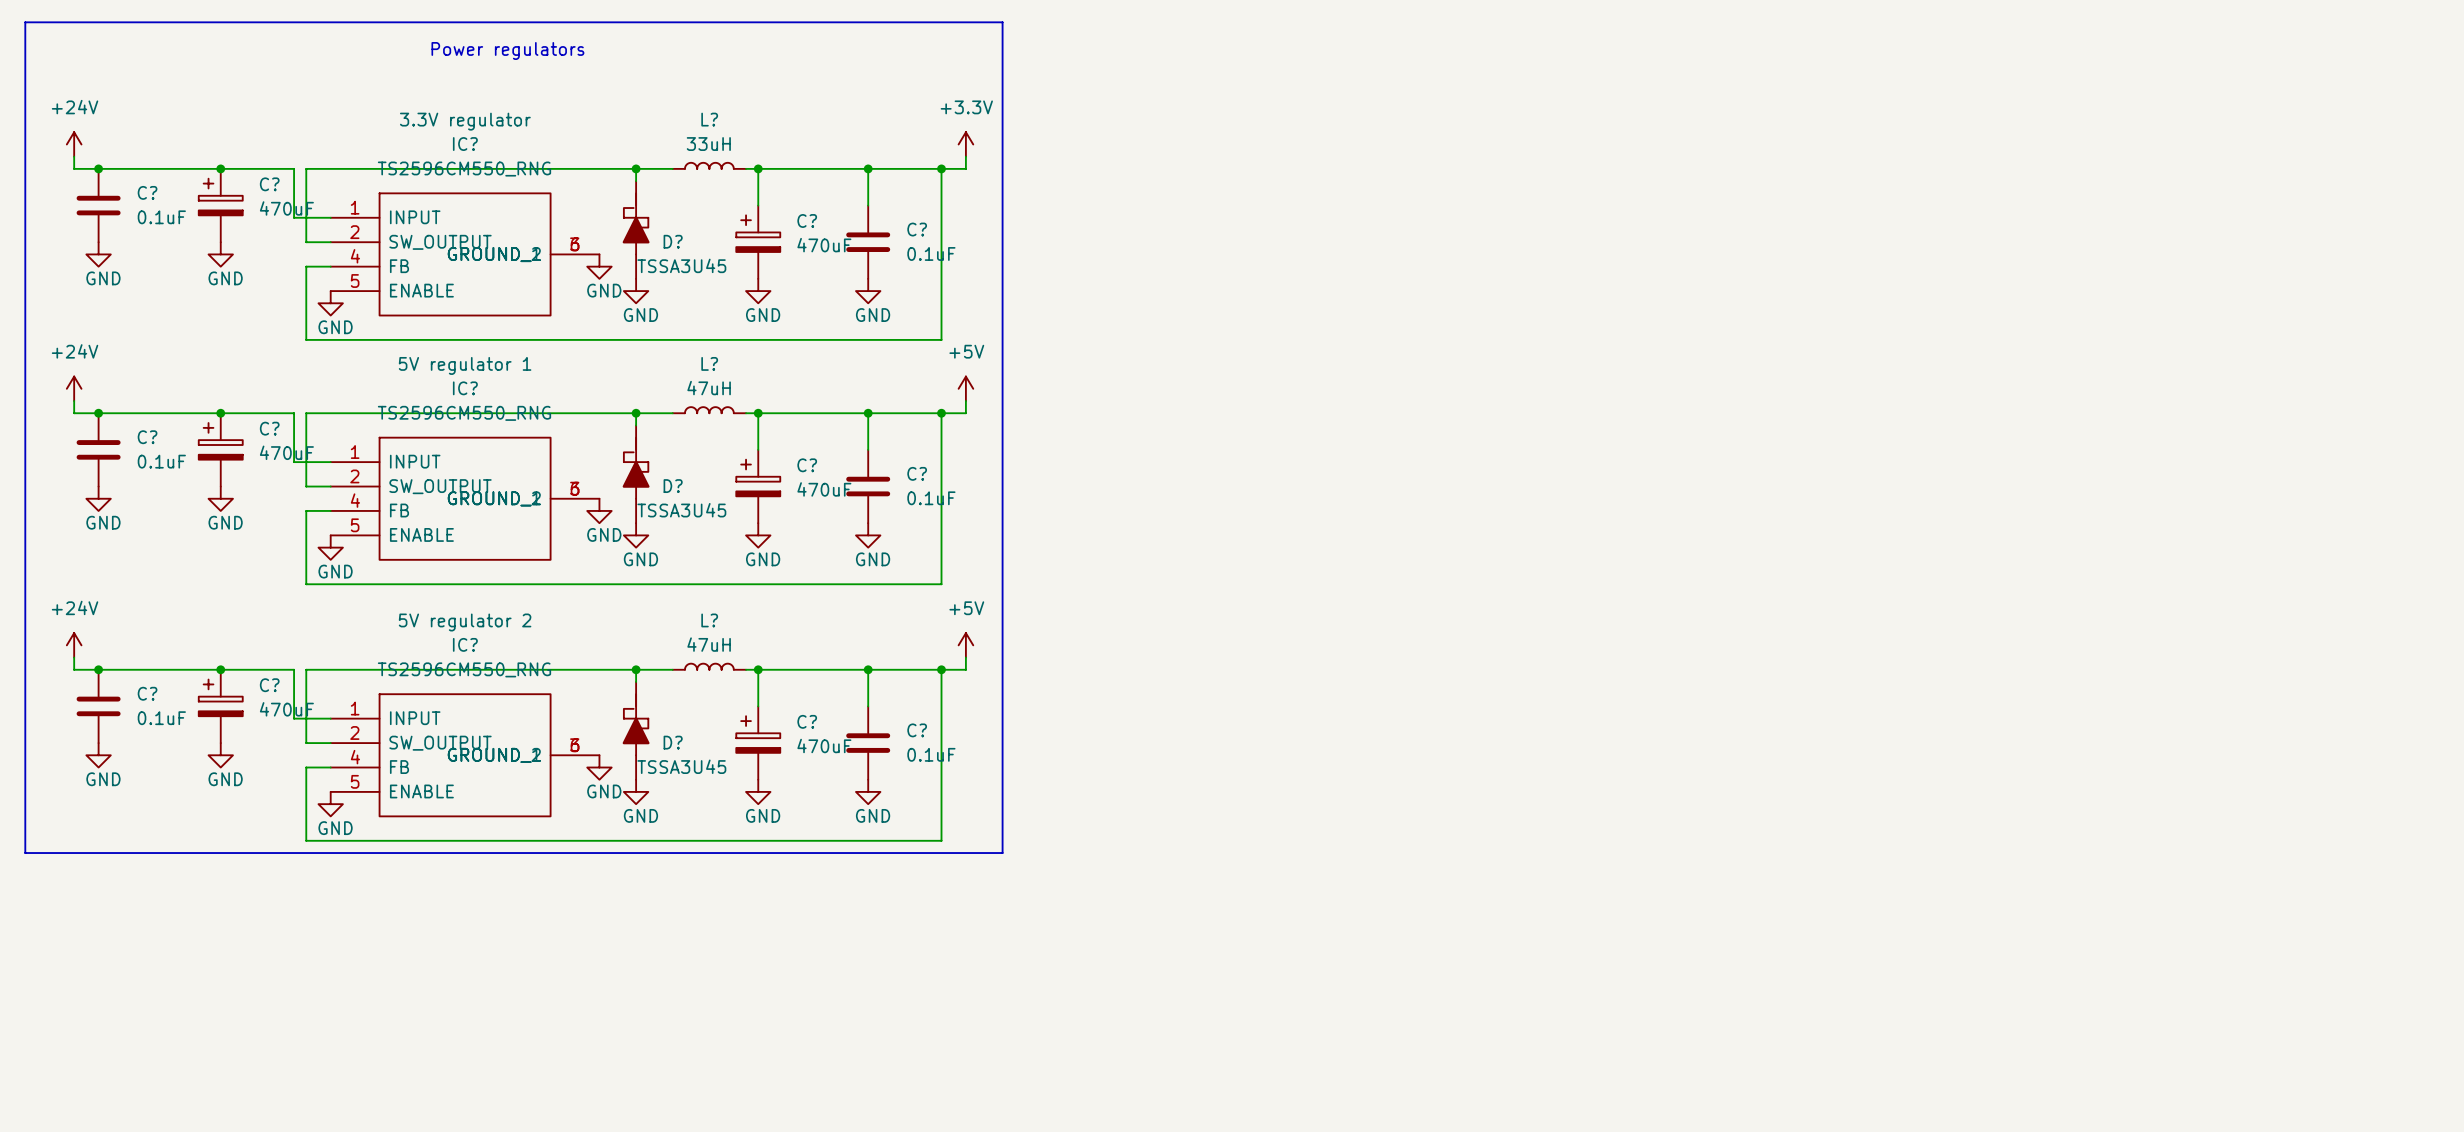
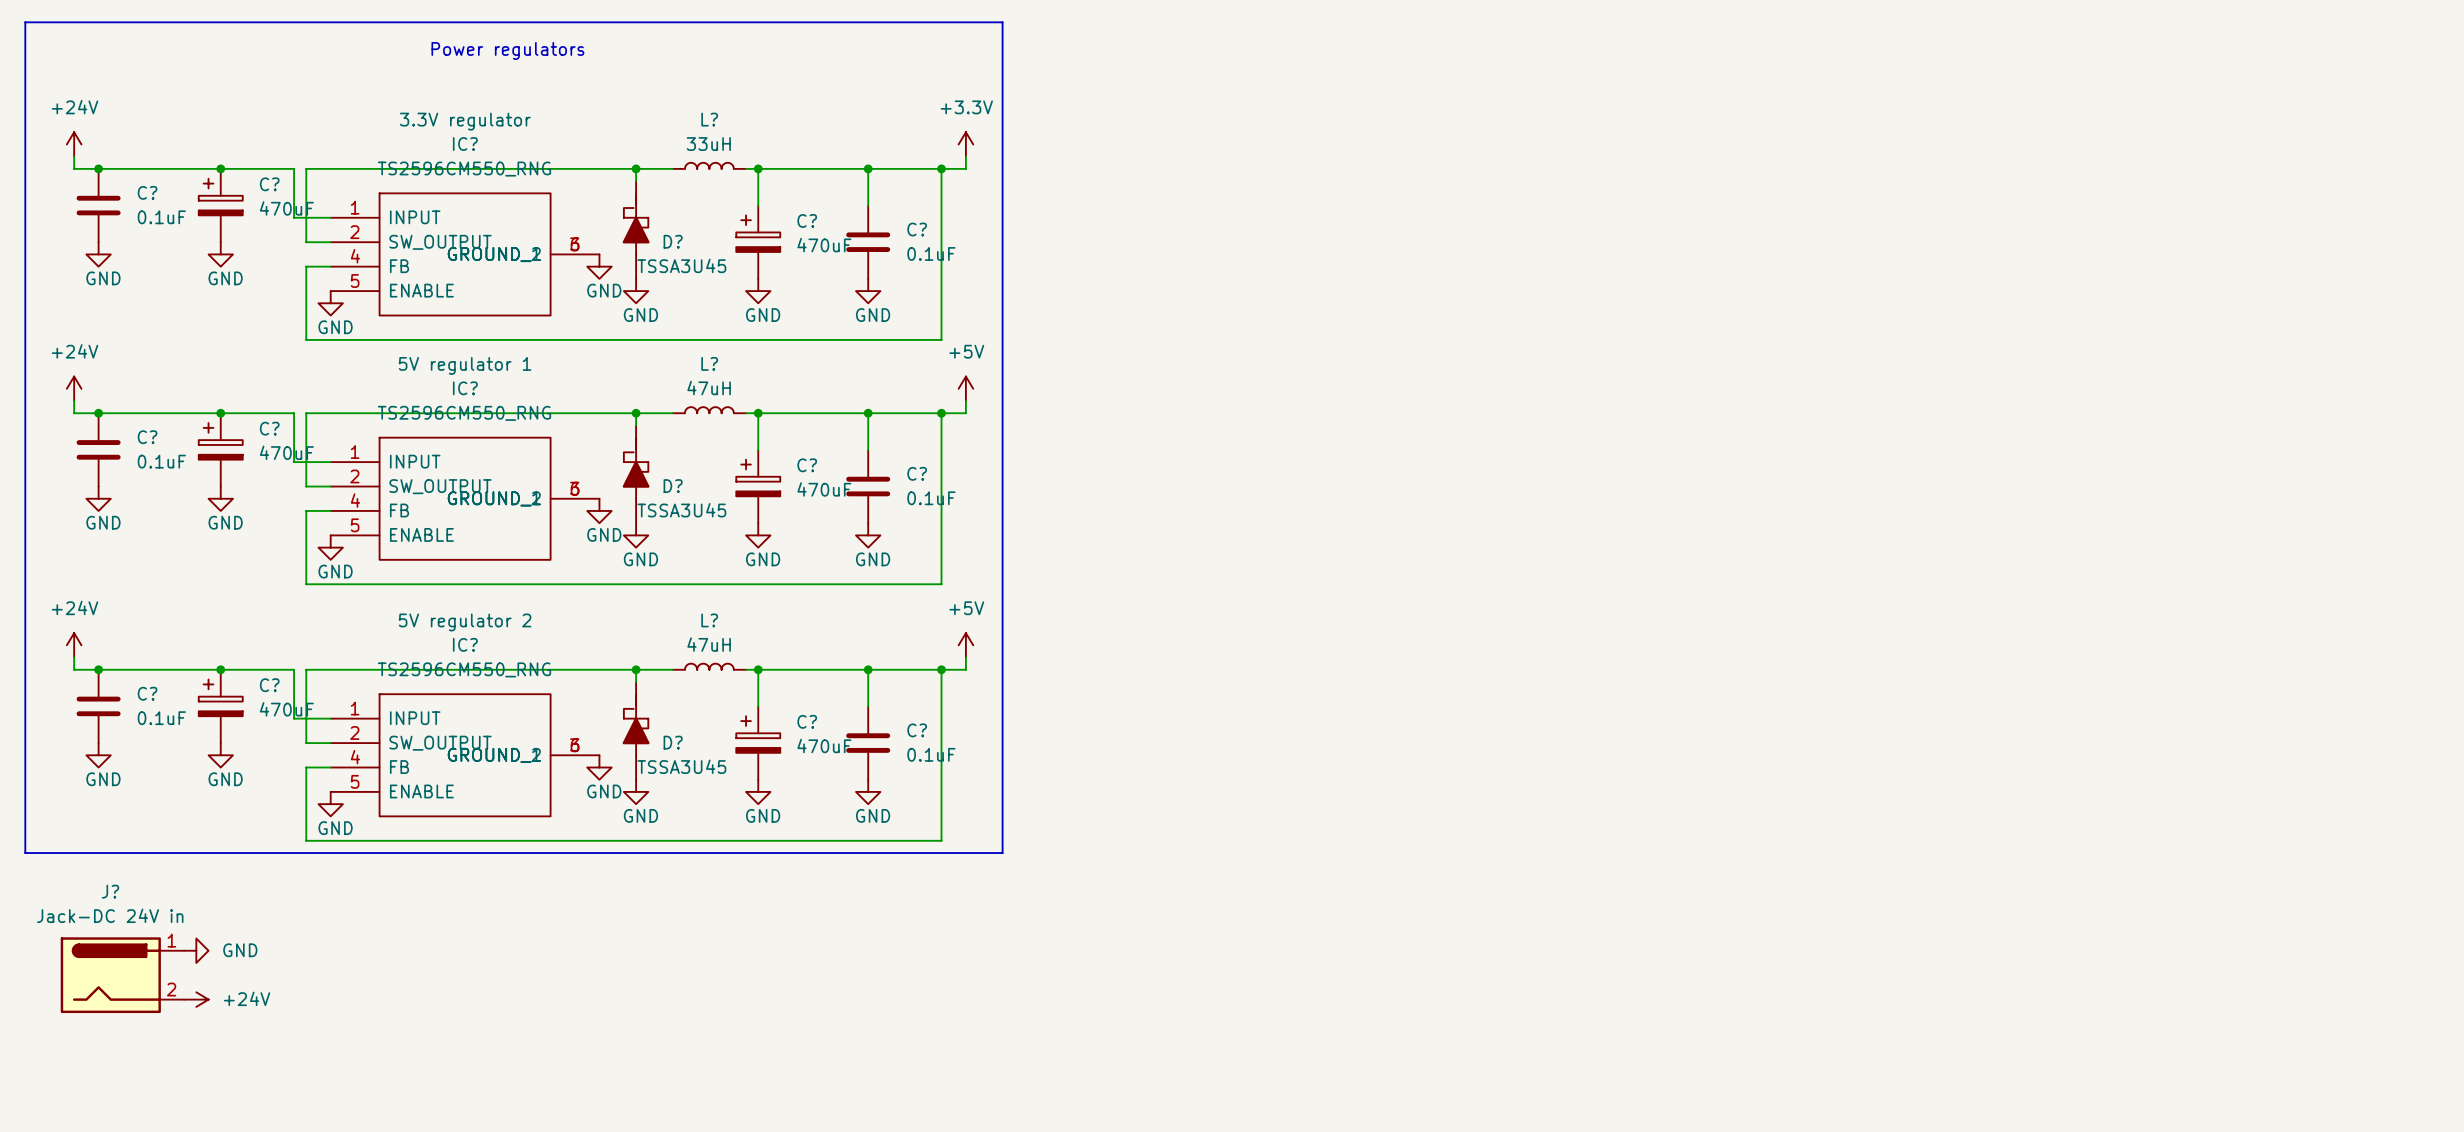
power symbol: none -> GND (196, 950)
J?: none -> Jack-DC 24V in (122, 975)
power symbol: none -> +24V (196, 999)

